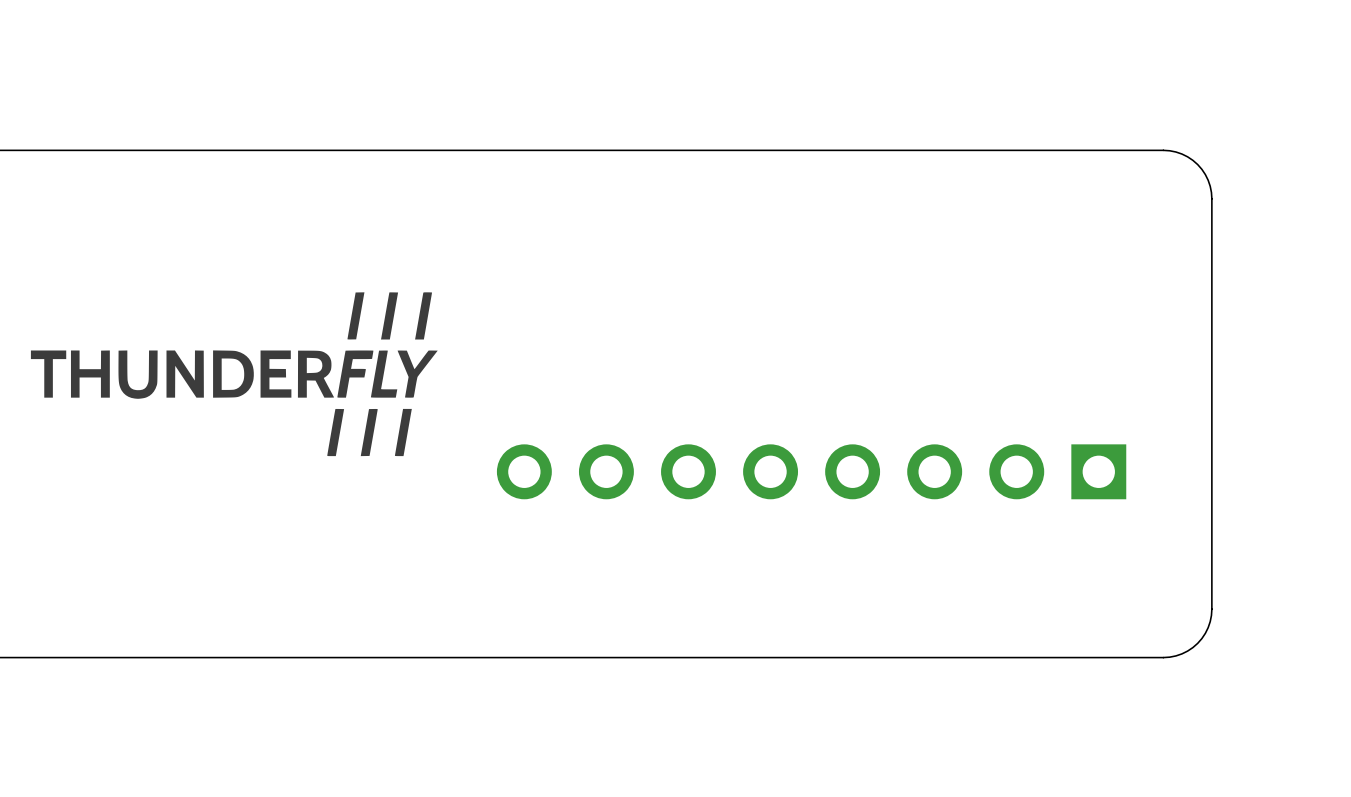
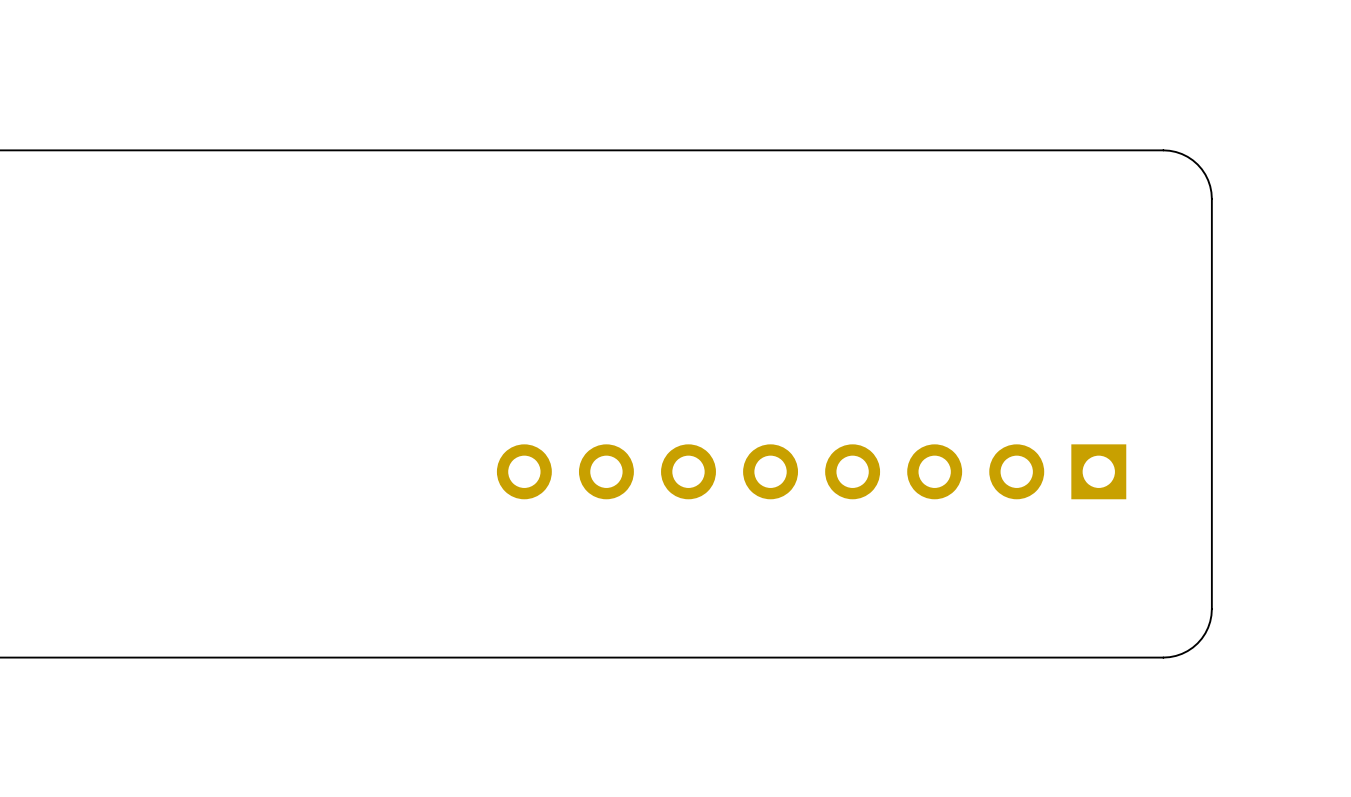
drawing: [30, 292, 438, 457] -> none

